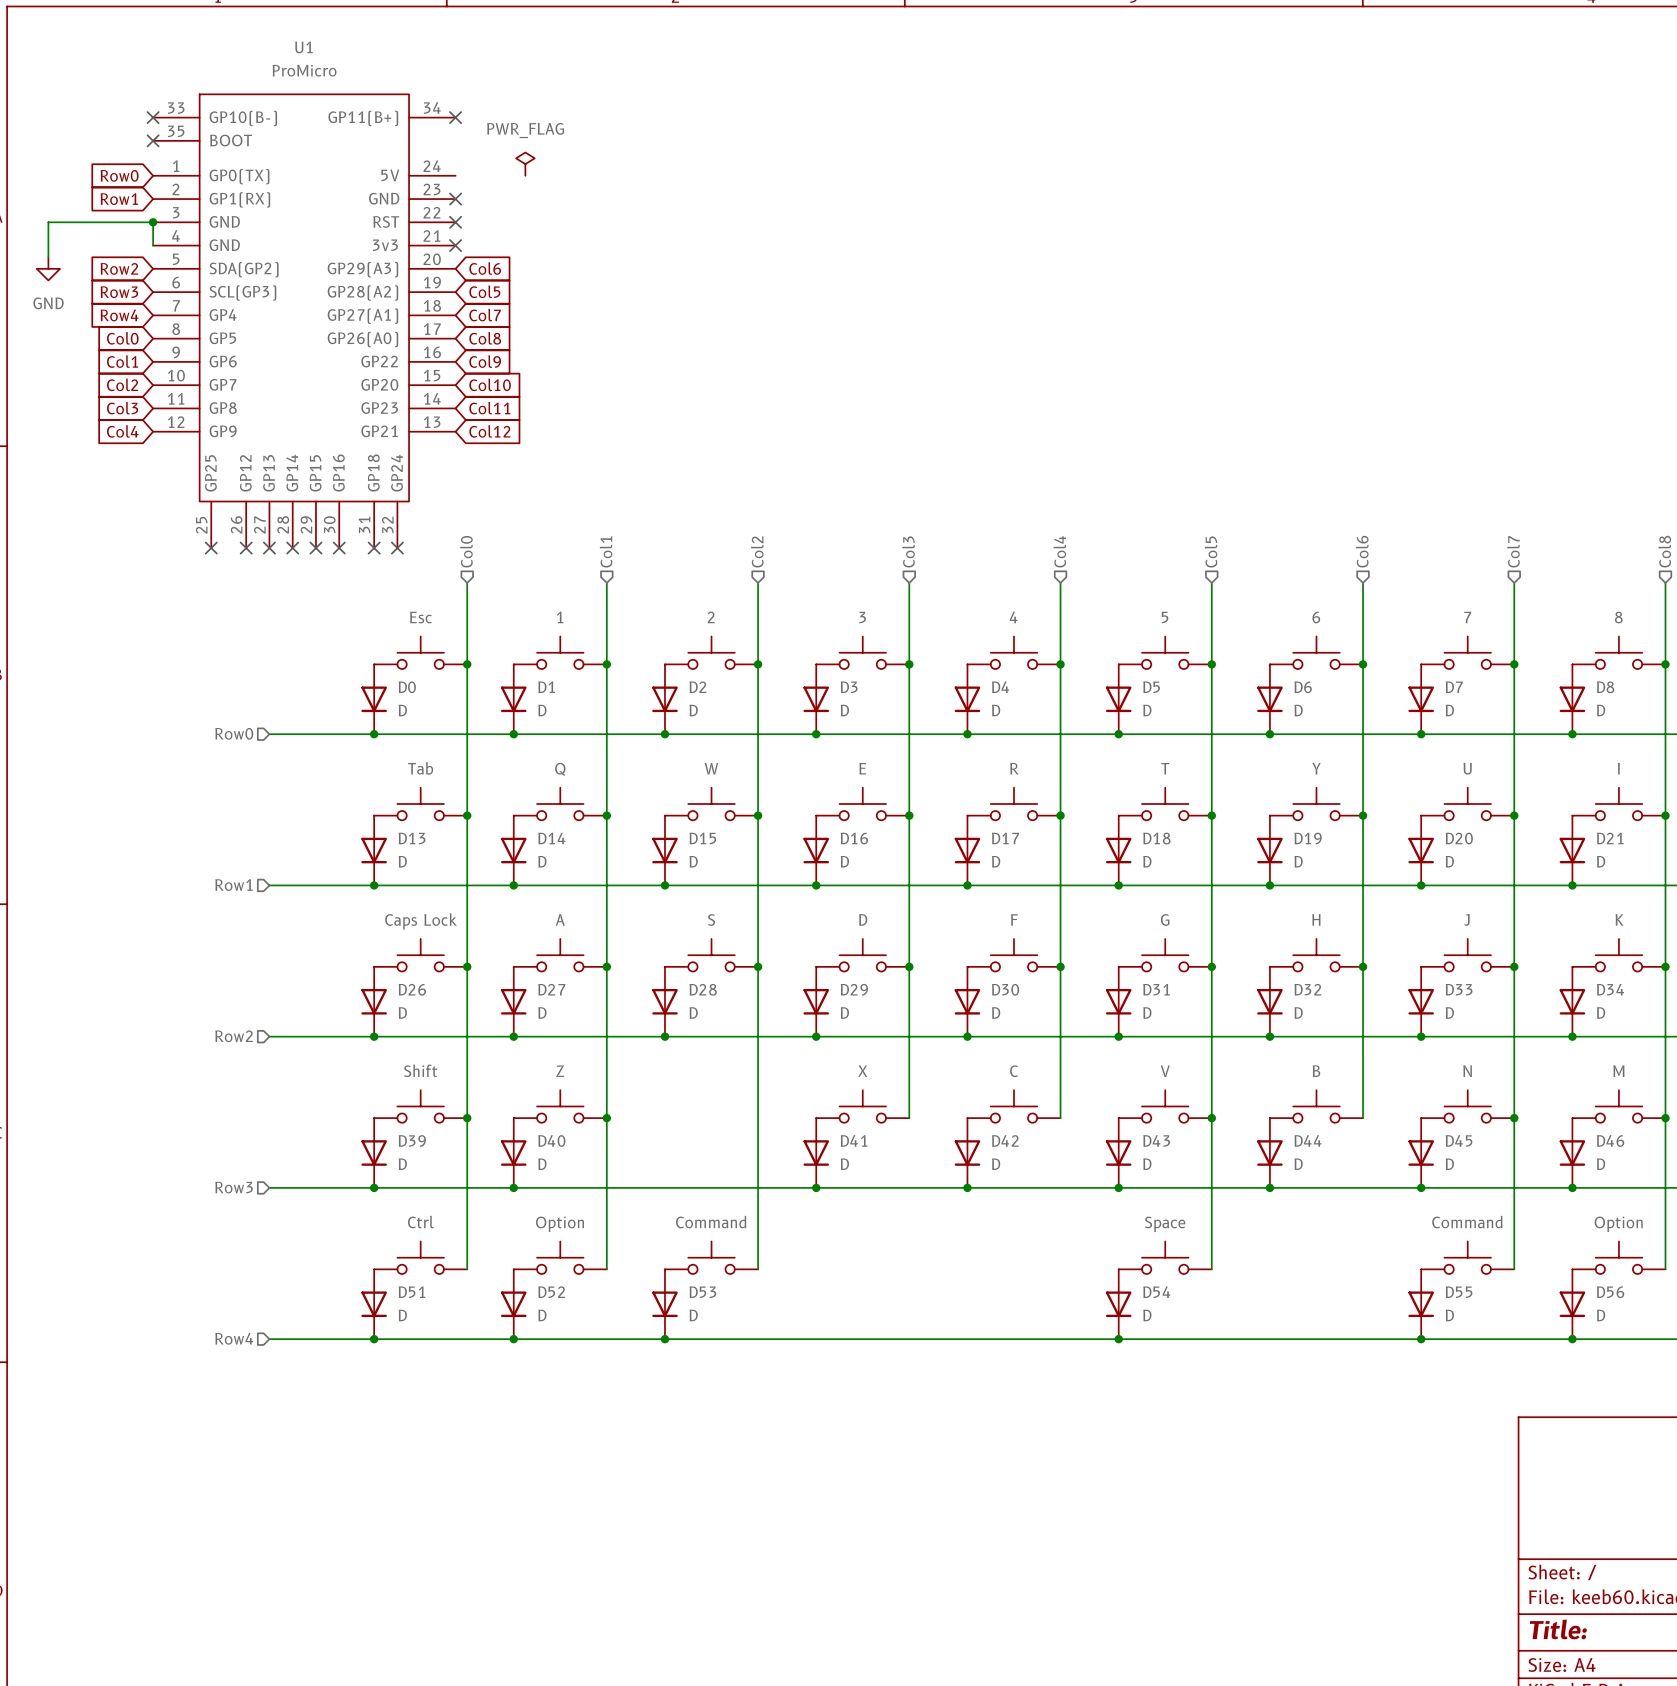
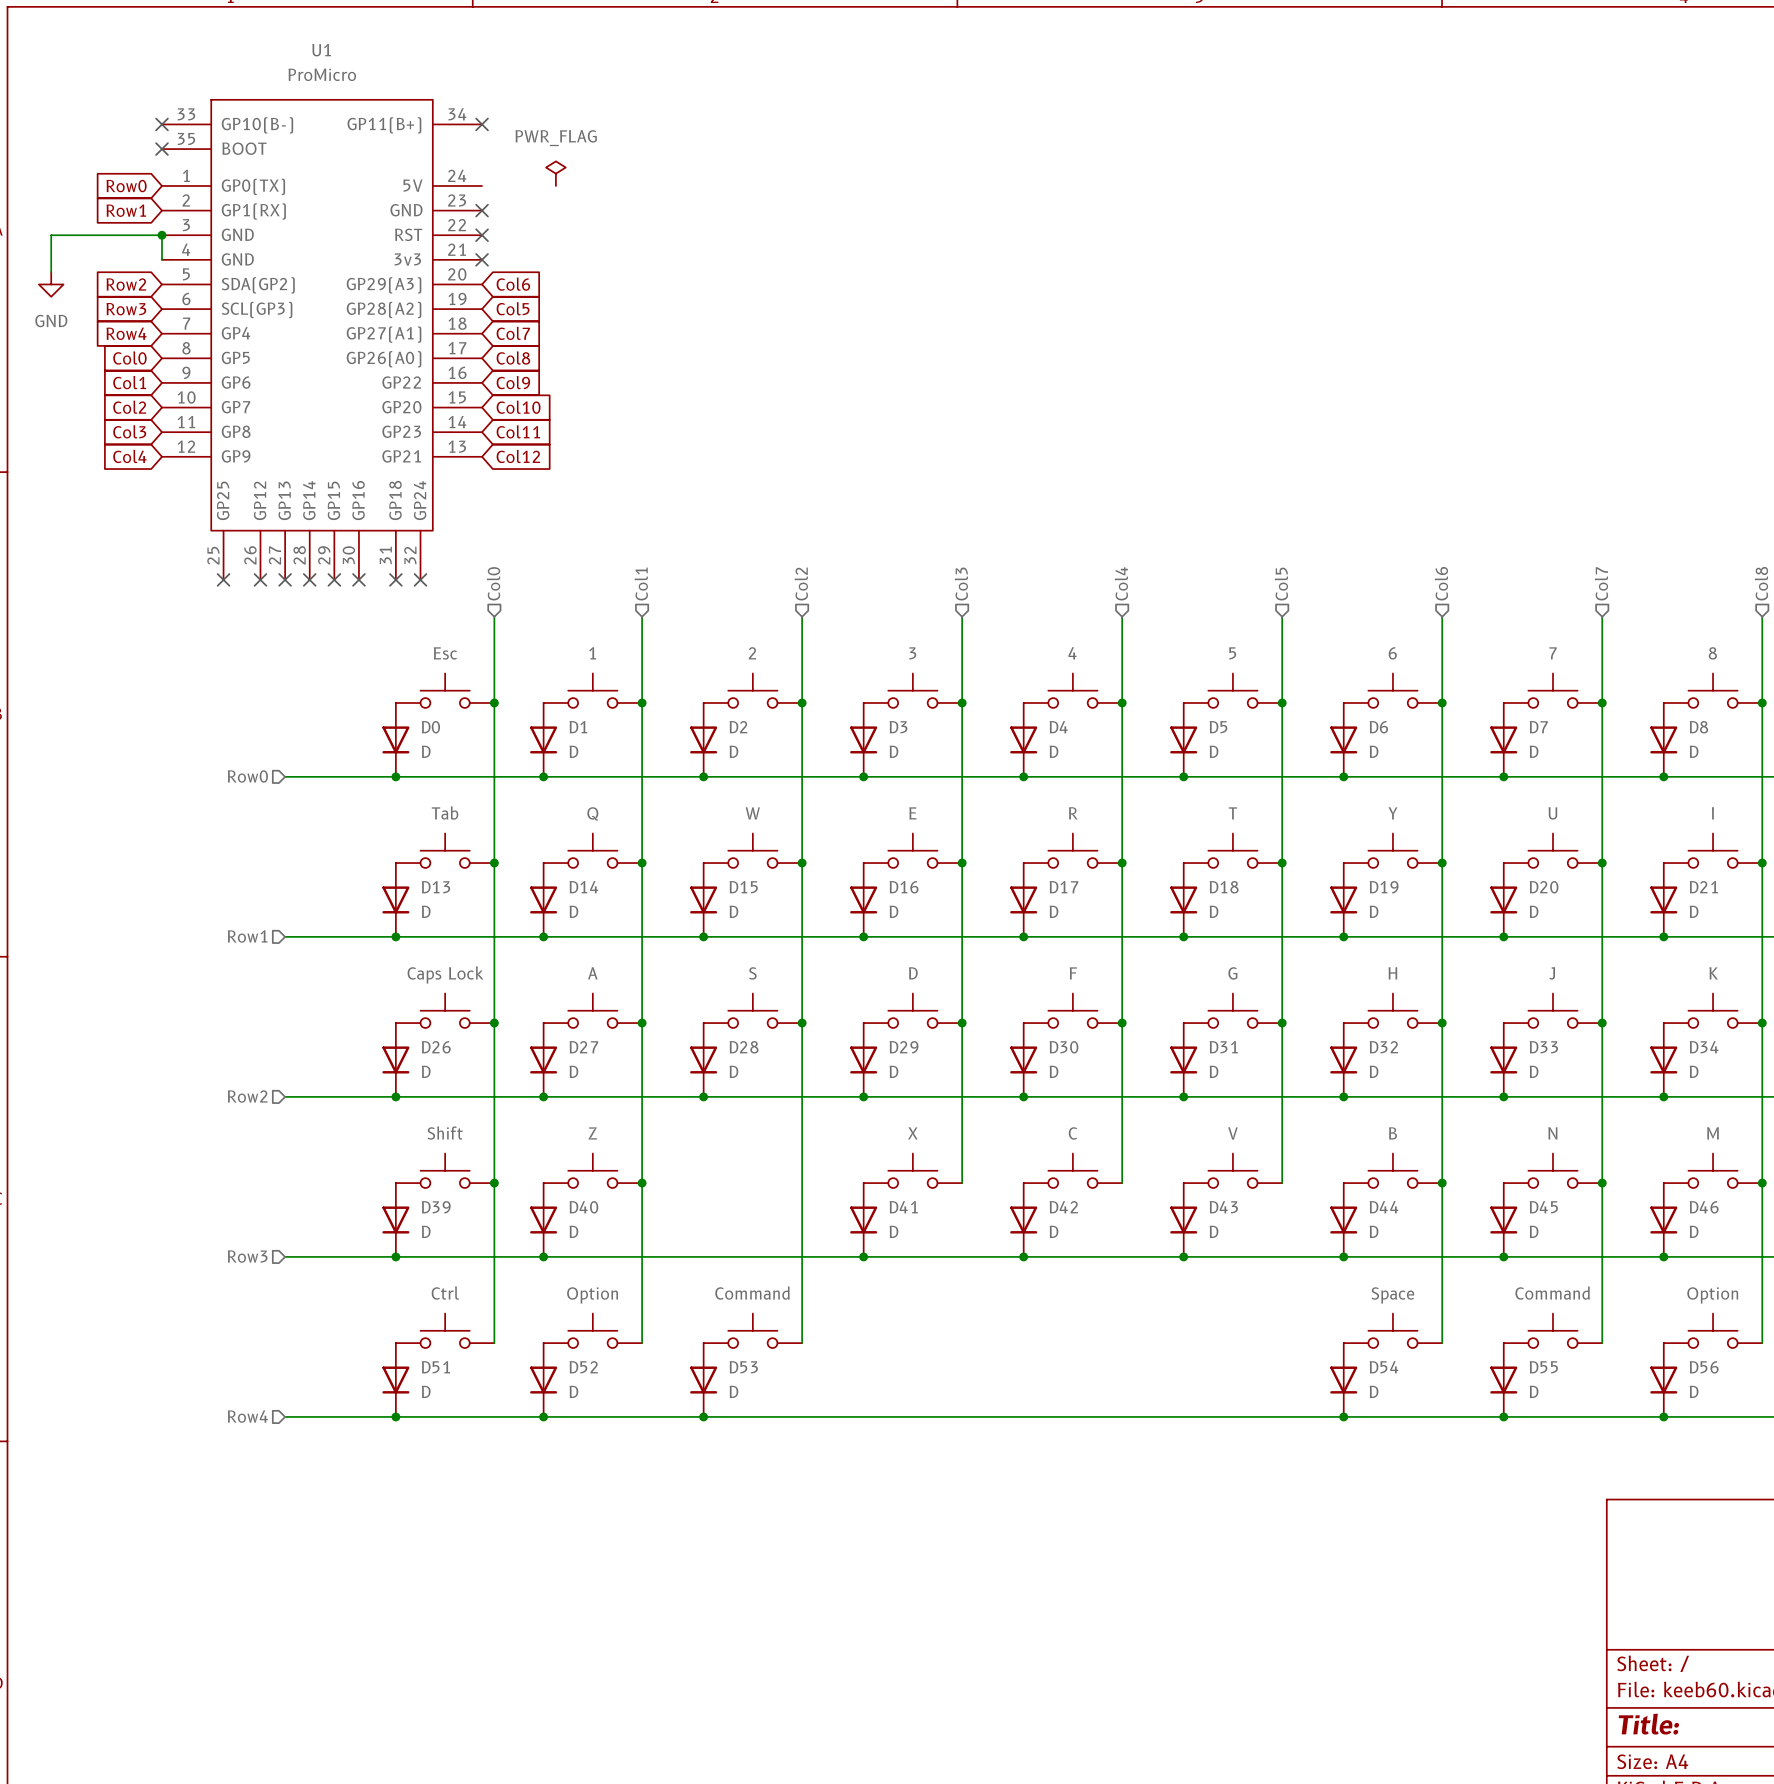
wire: (1211, 1118) (1211, 1269) -> (1442, 1183) (1442, 1343)
junction: (1211, 1118) -> none
junction: none -> (1442, 1183)
part position: (1165, 1257) -> (1392, 1330)
D54 position: (1118, 1304) -> (1343, 1380)
junction: (1118, 1339) -> none
junction: none -> (1343, 1416)

